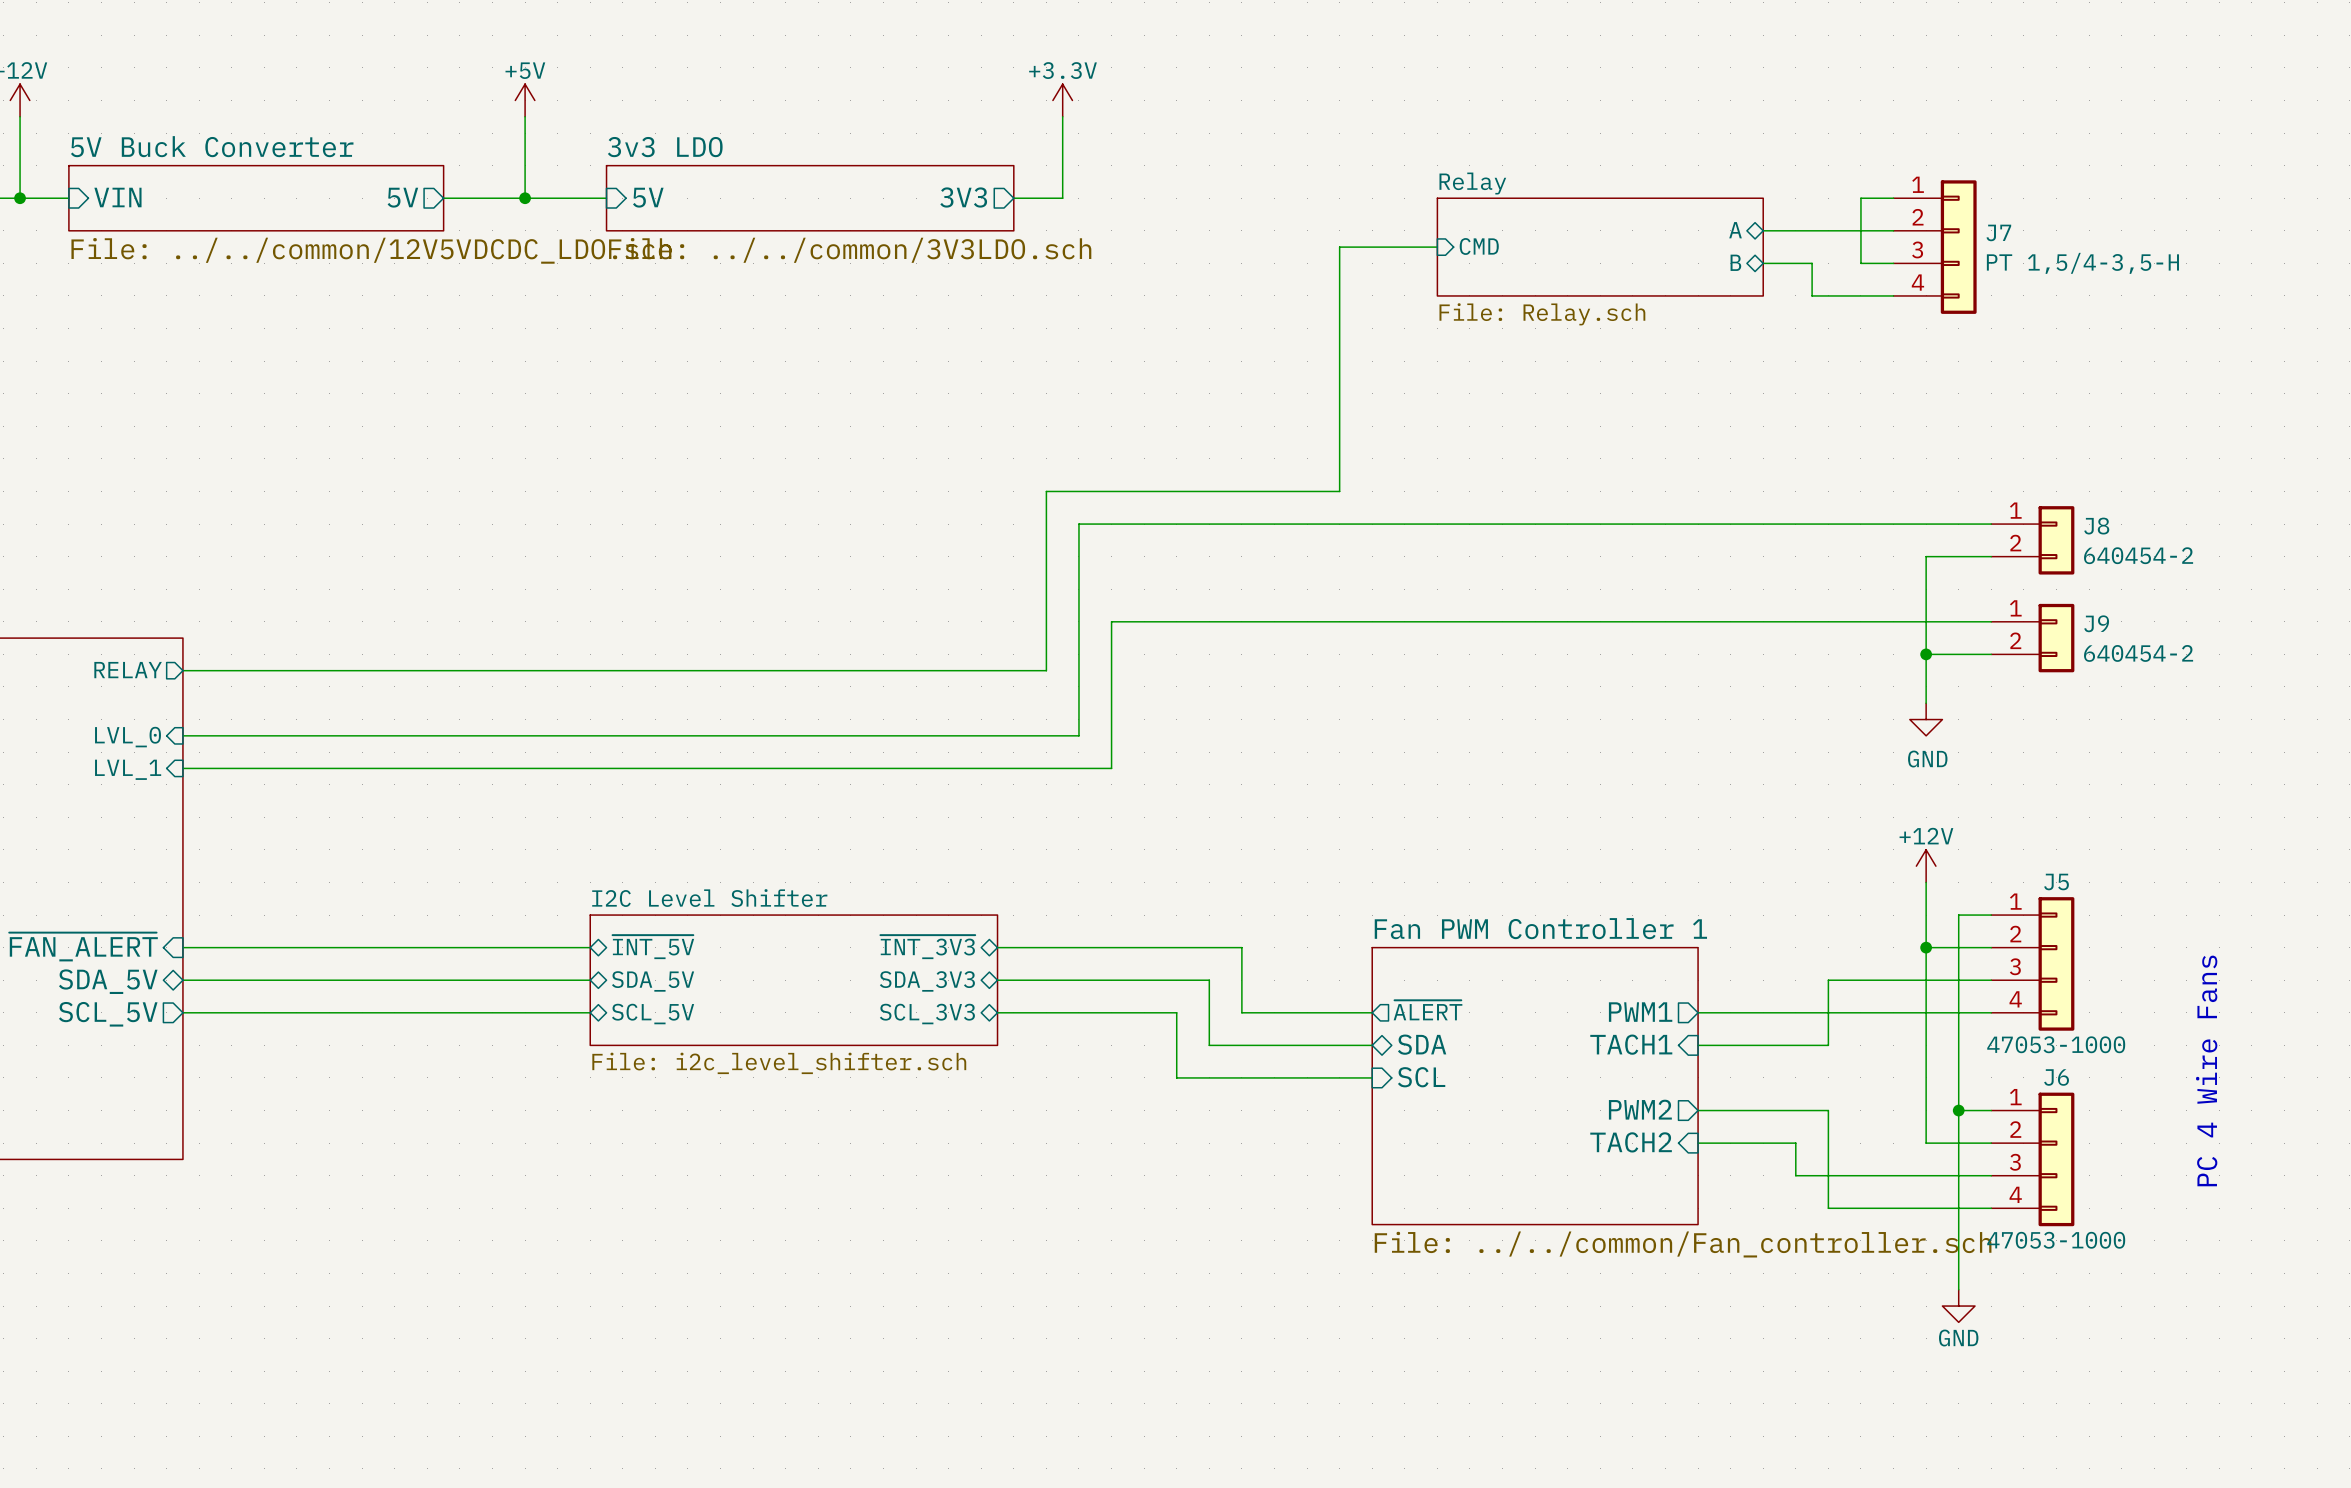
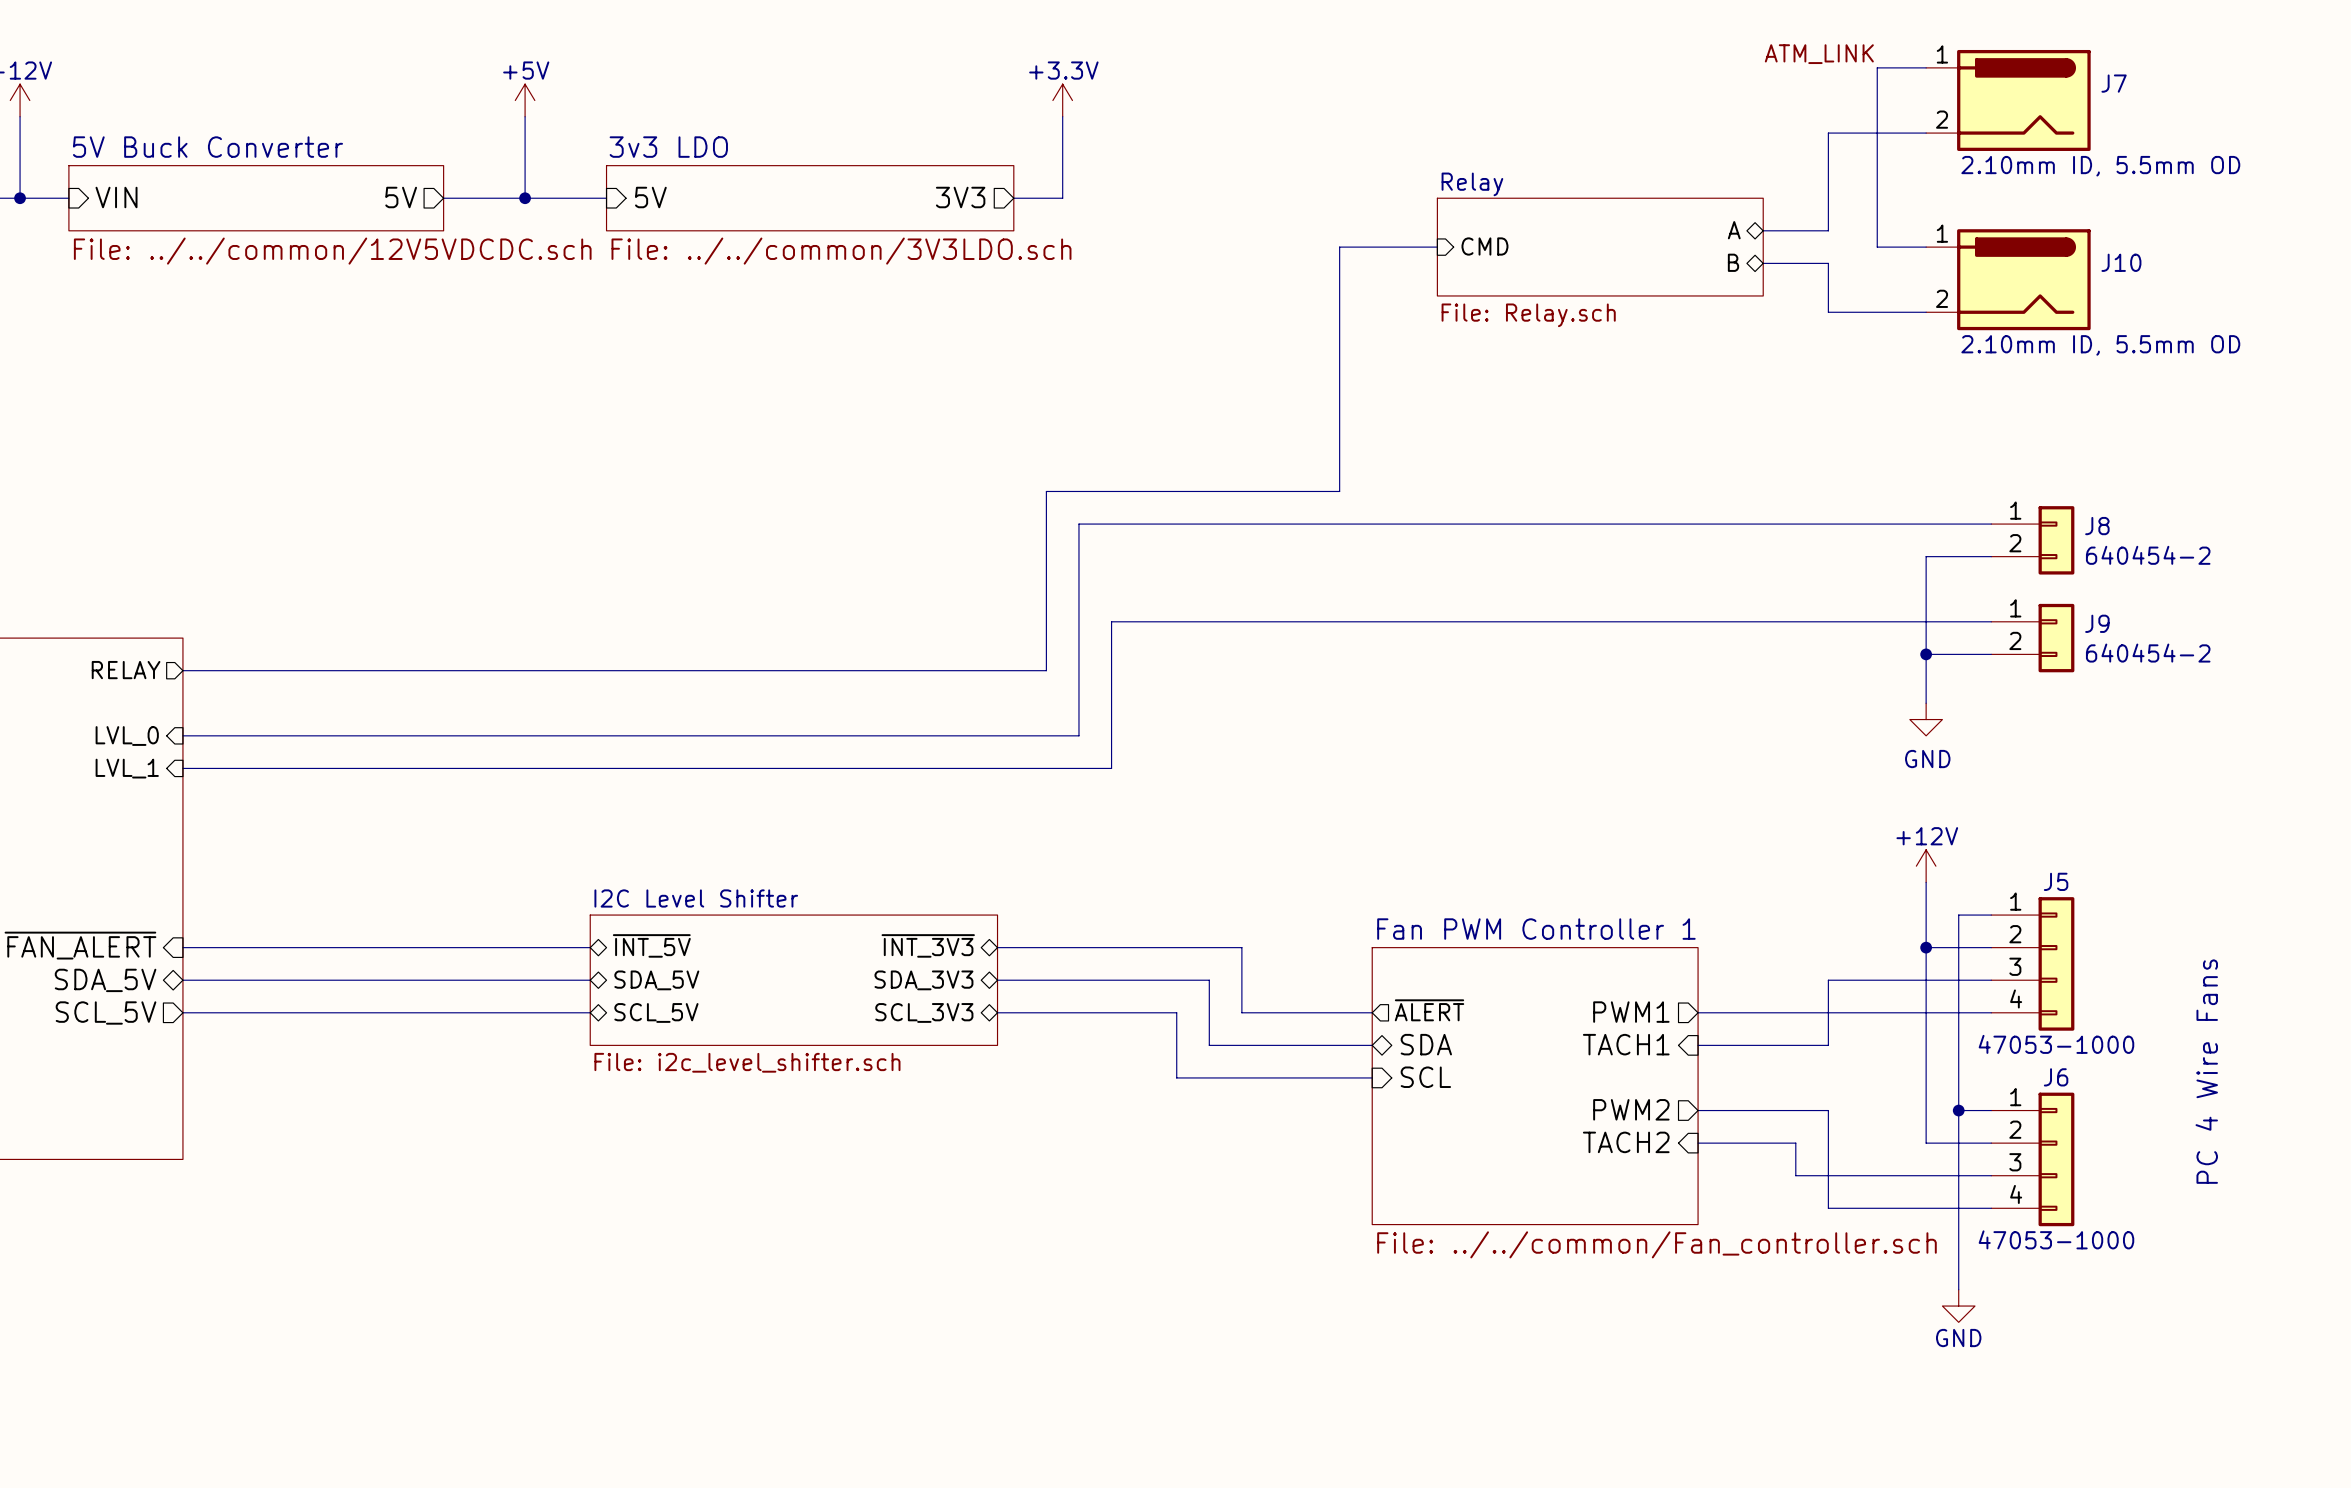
label: none -> ATM_LINK (1819, 54)
wire: none -> (1926, 67) (1877, 67) (1877, 247) (1926, 247)
J7 symbol: [1893, 180, 1977, 314] -> [1926, 49, 2091, 151]
wire: (1893, 198) (1860, 198) (1860, 263) (1893, 263) -> none
wire: (1828, 230) (1893, 230) -> (1828, 230) (1828, 133) (1926, 133)
J7 name position: J7 (1998, 232) -> J7 (2114, 83)
sheet 5V Buck Converter value: File: ../../common/12V5VDCDC_LDO.sch (371, 250) -> File: ../../common/12V5VDCDC.sch (332, 251)
wire: (1812, 263) (1812, 295) (1893, 295) -> (1812, 263) (1828, 263) (1828, 312) (1926, 312)
J7 value: PT 1,5/4-3,5-H (2082, 263) -> 2.10mm ID, 5.5mm OD (2100, 166)
J10: none -> 2.10mm ID, 5.5mm OD (2008, 279)

